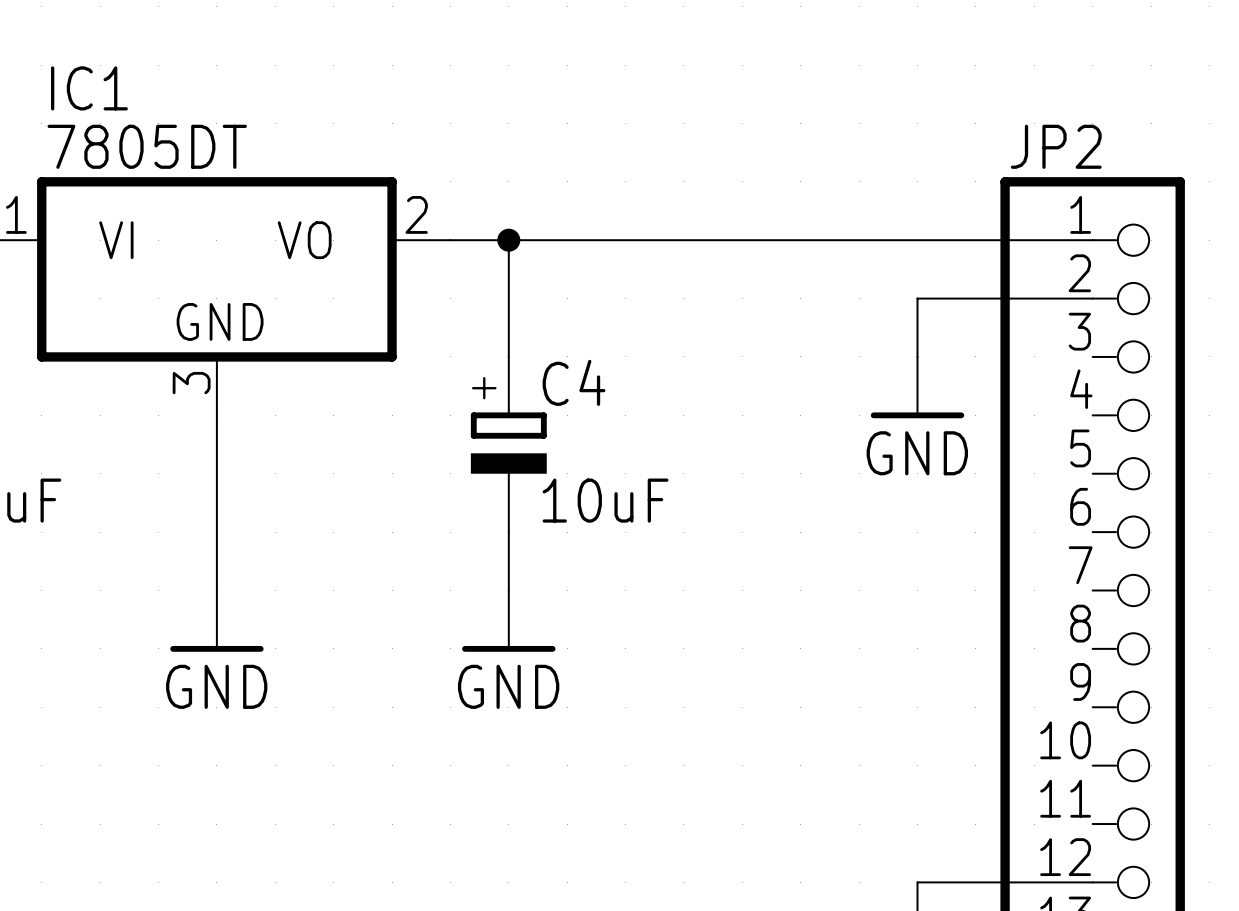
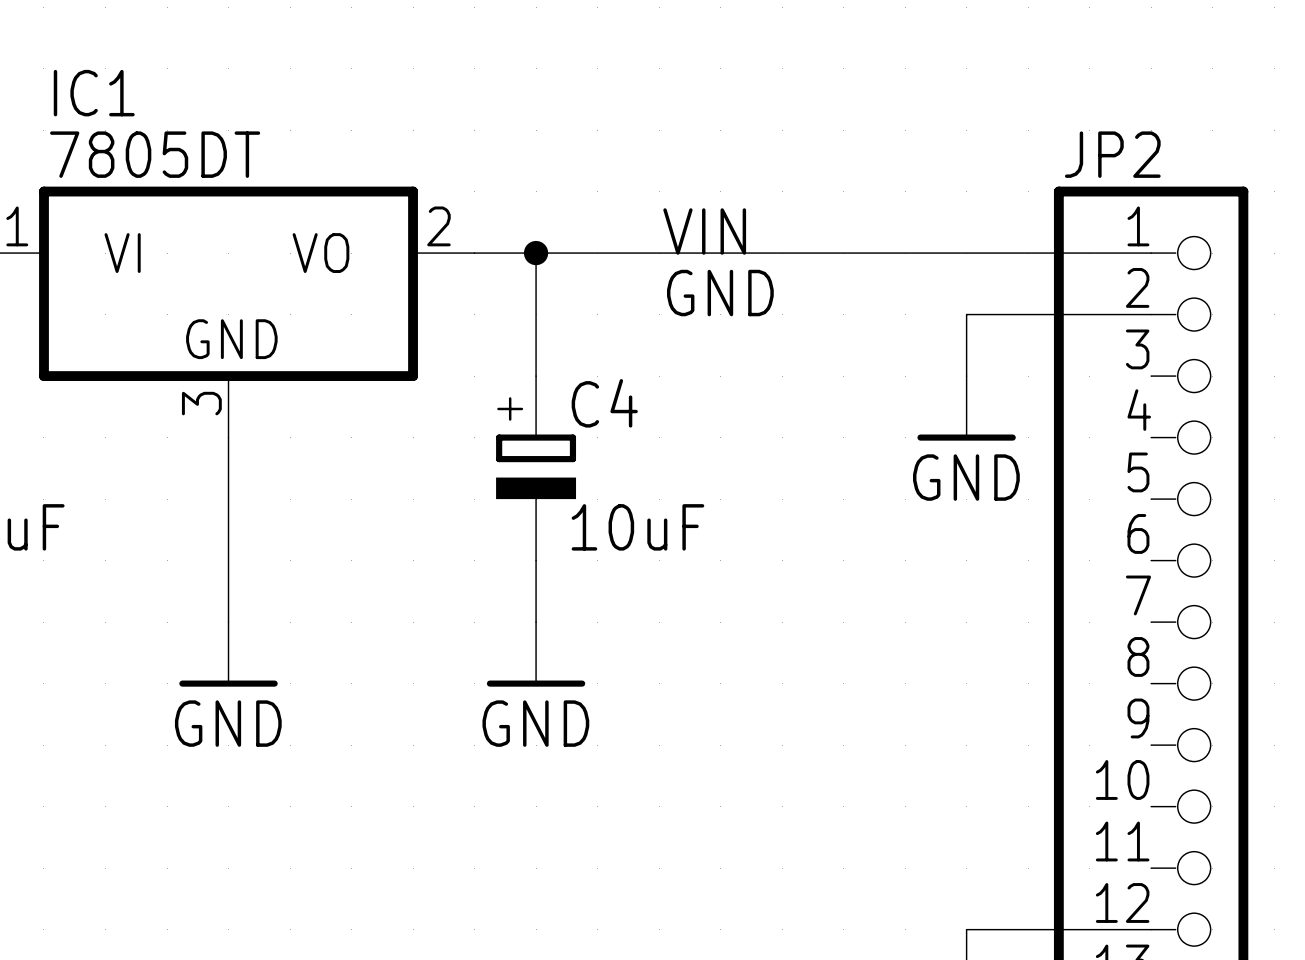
label: none -> VIN (704, 231)
label: none -> GND (720, 293)

